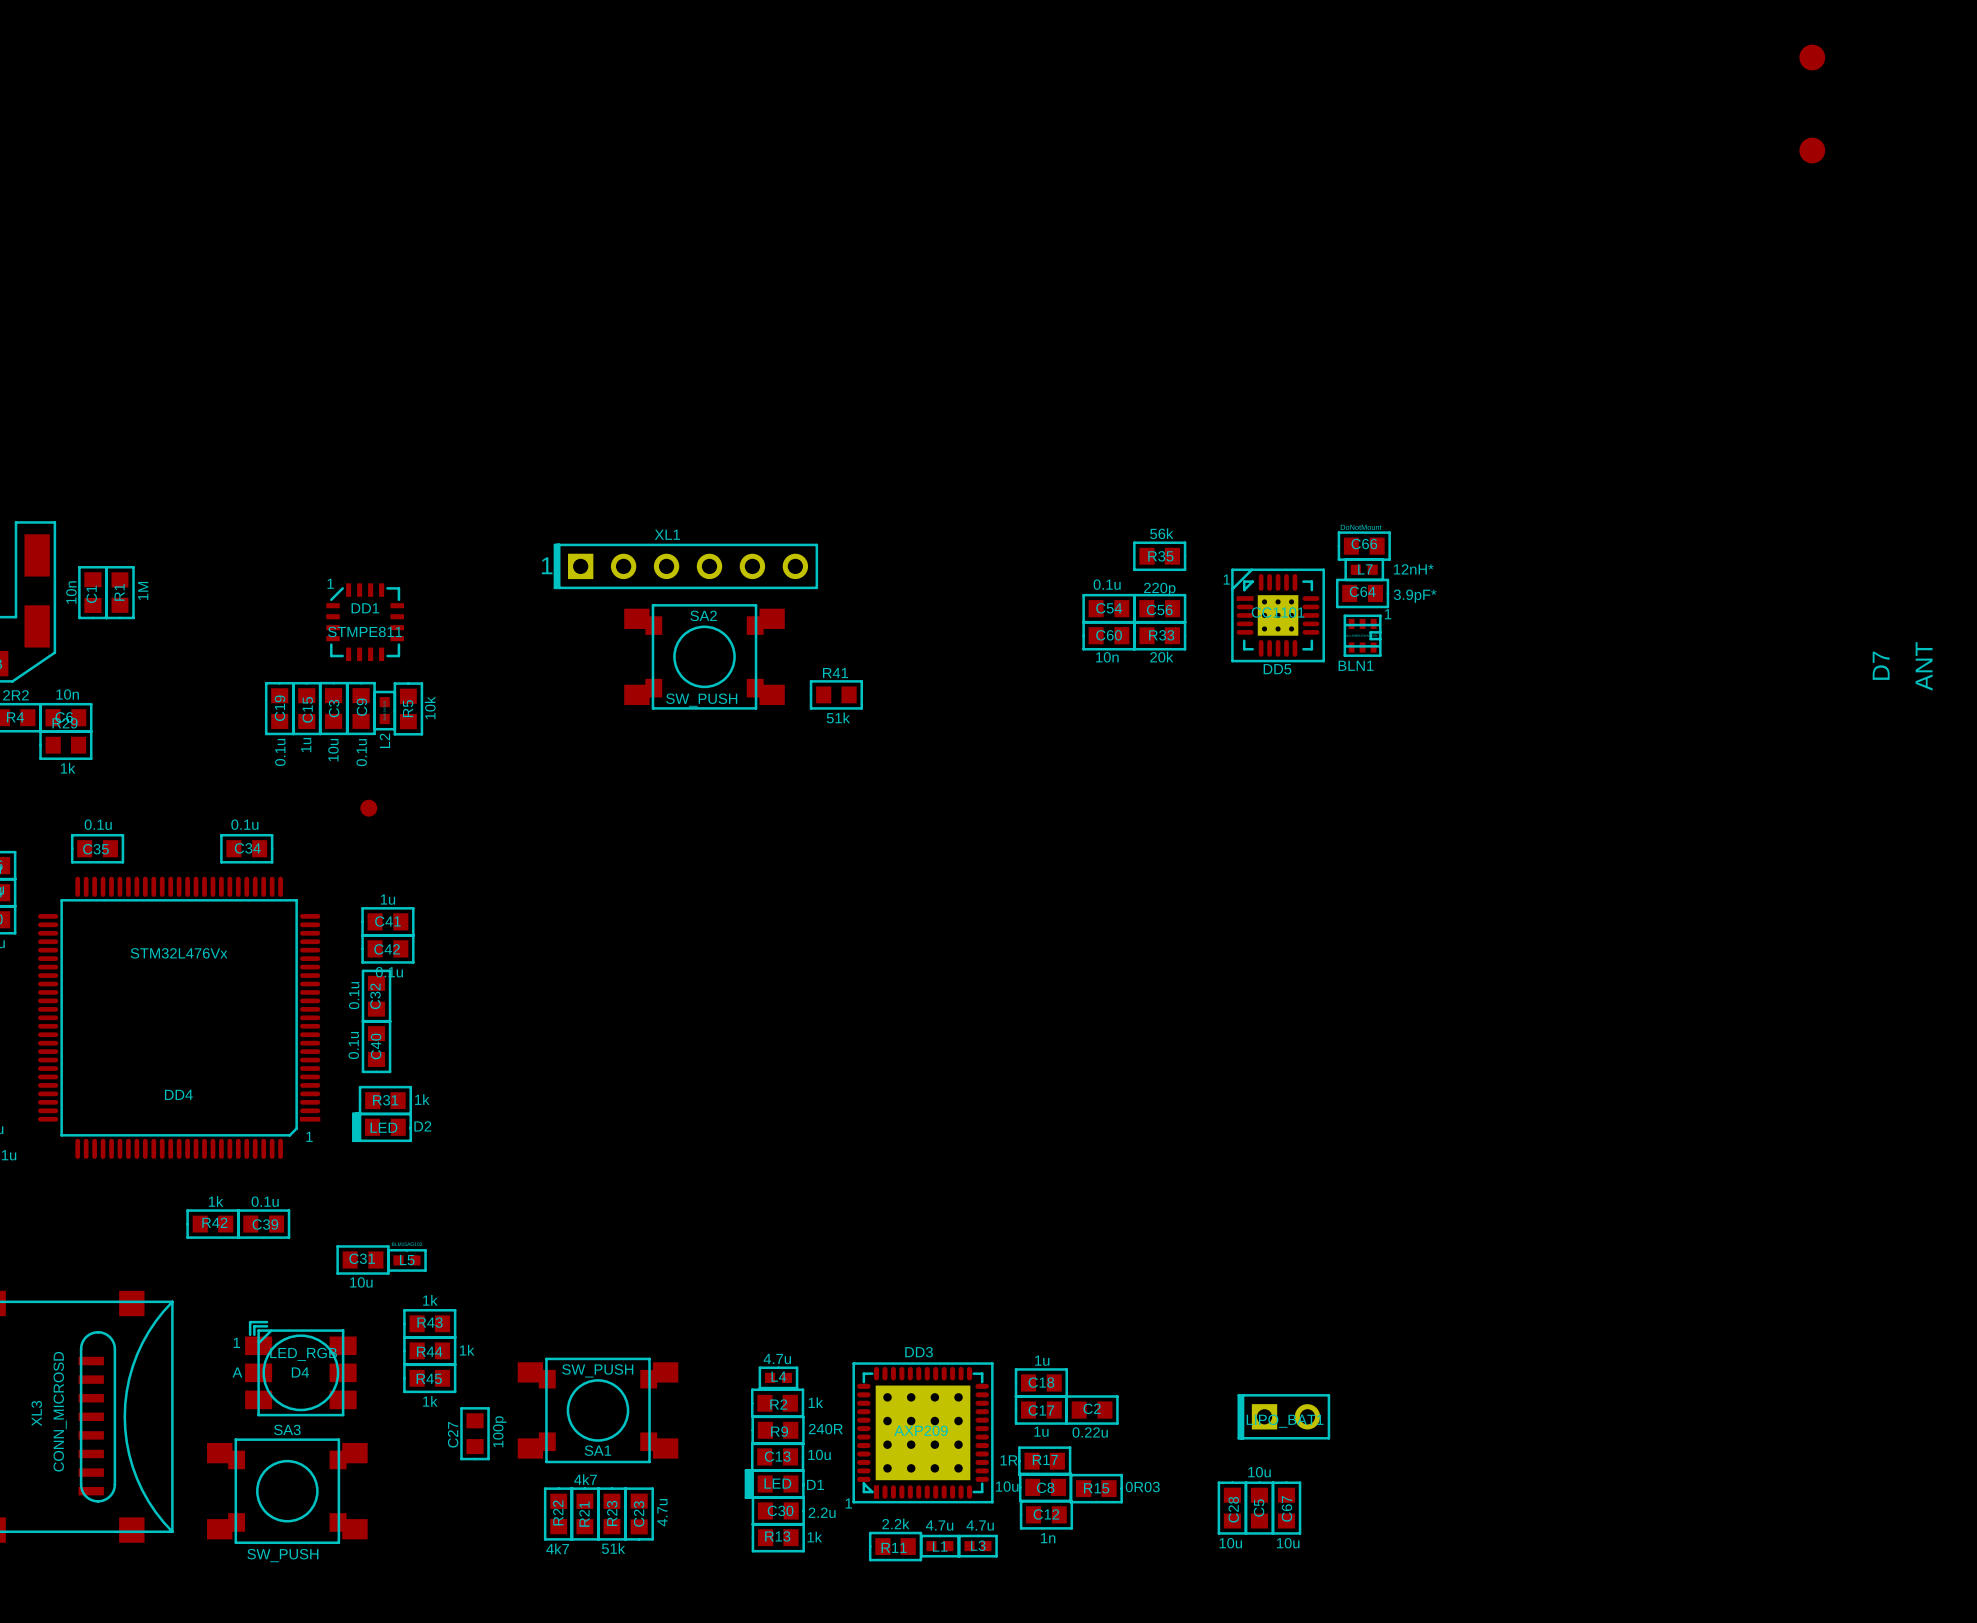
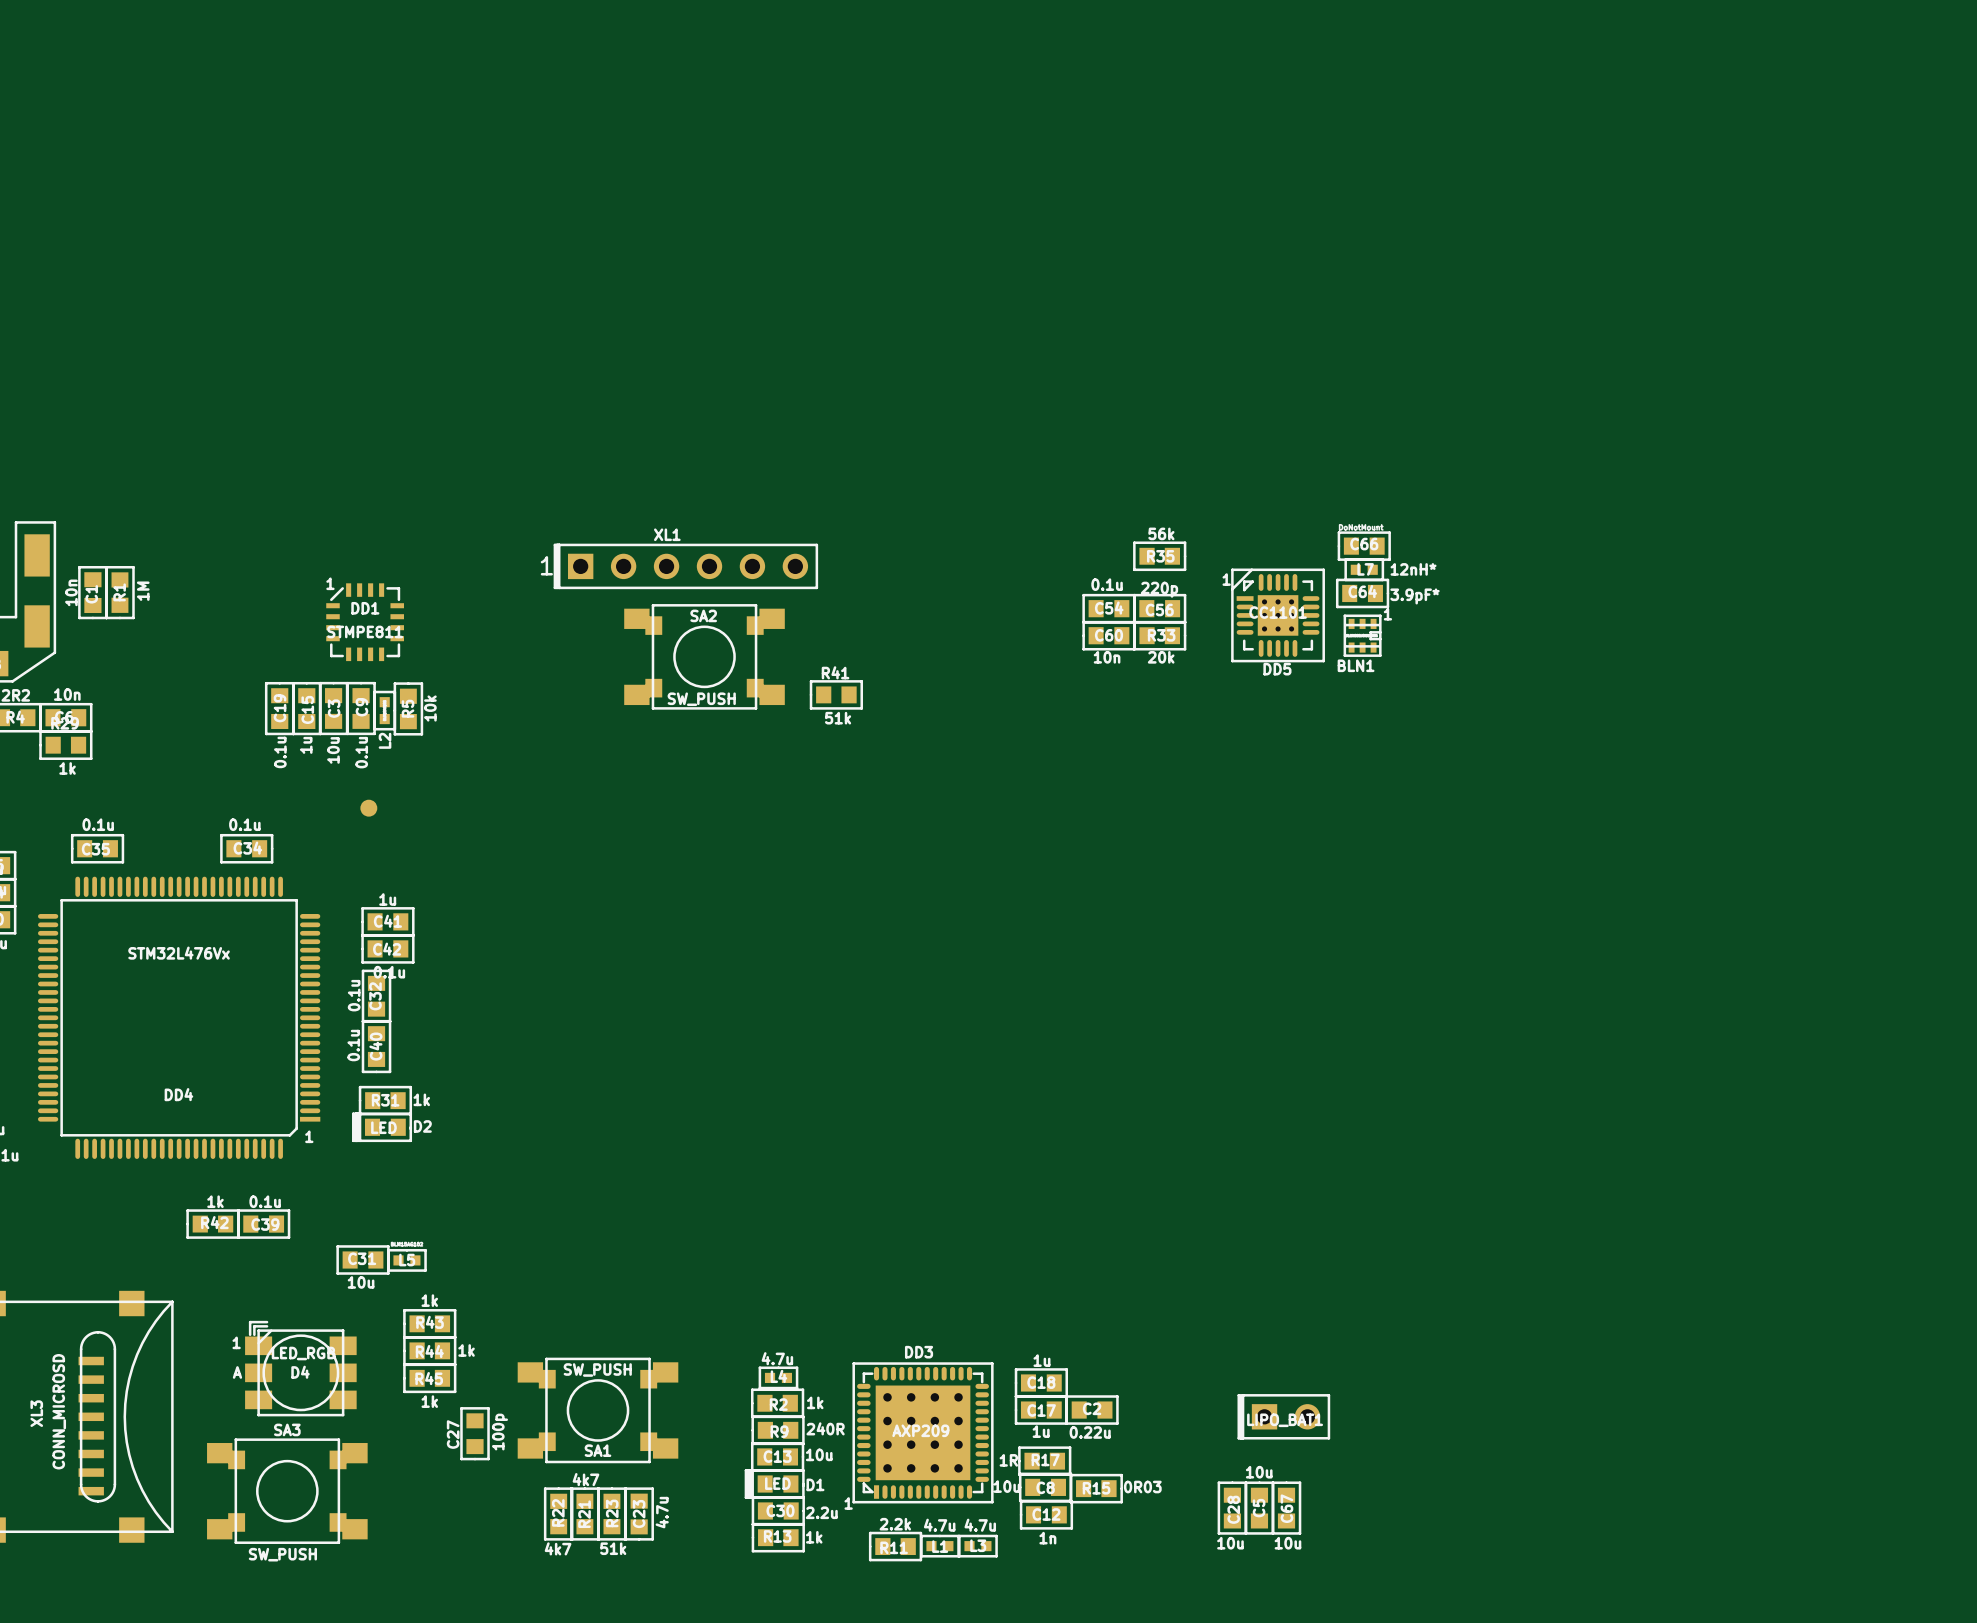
D7: ANT (1812, 104) -> none

